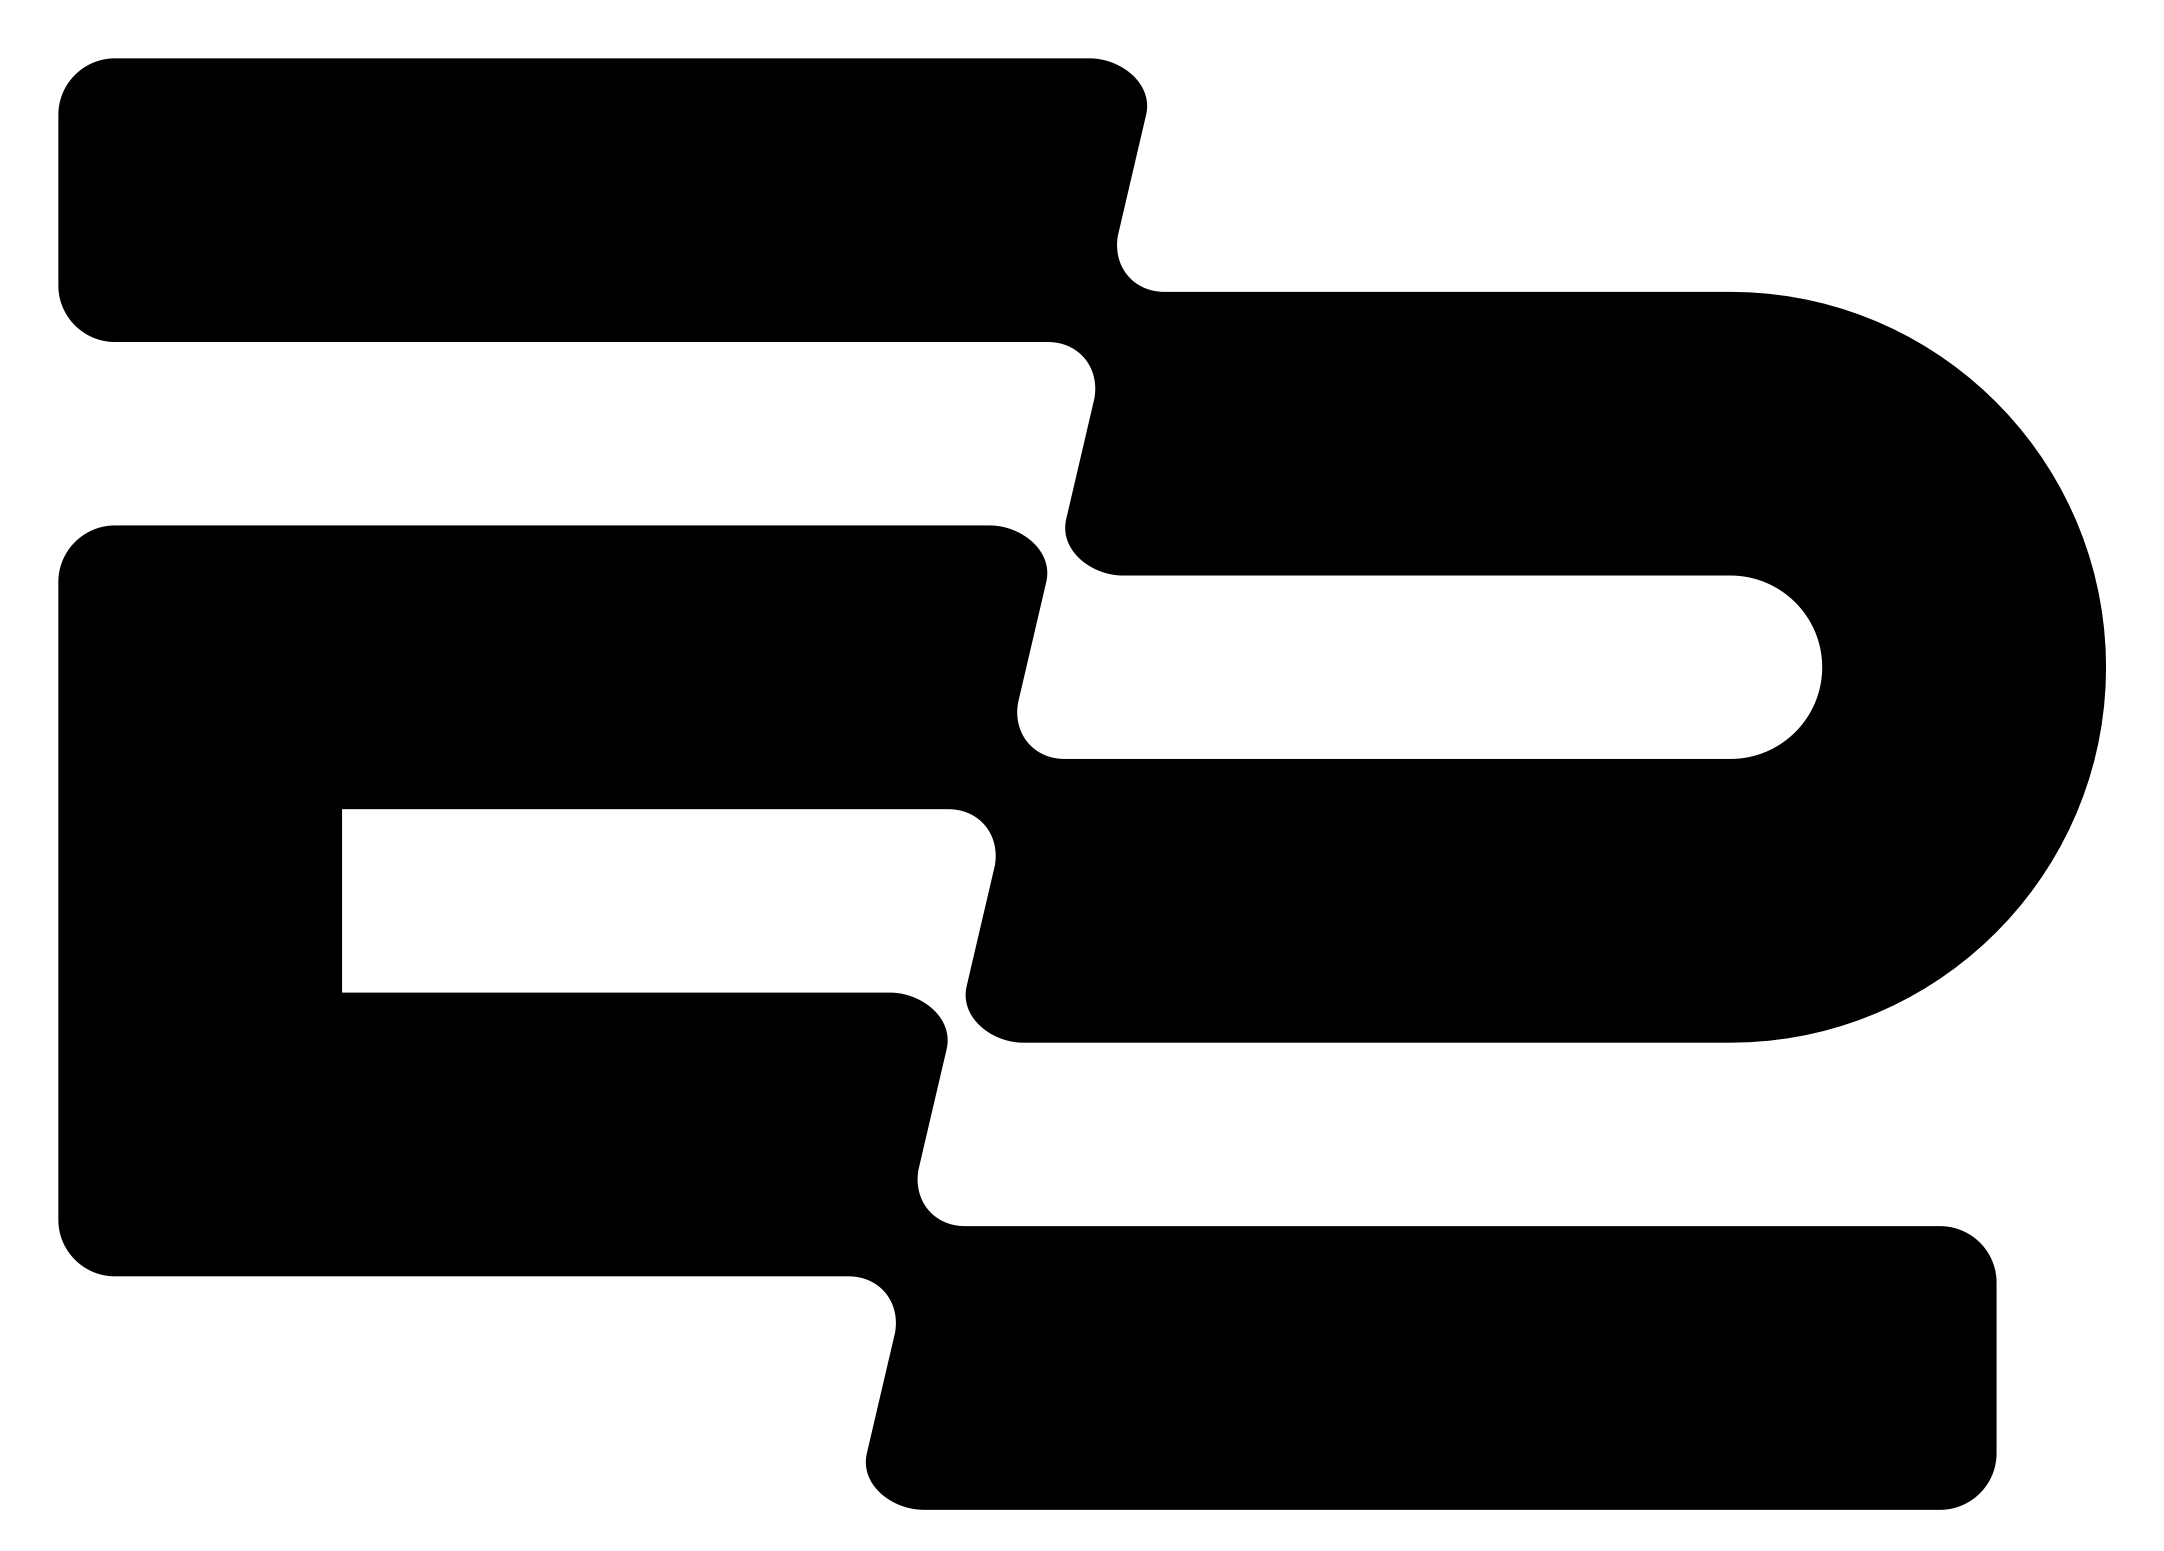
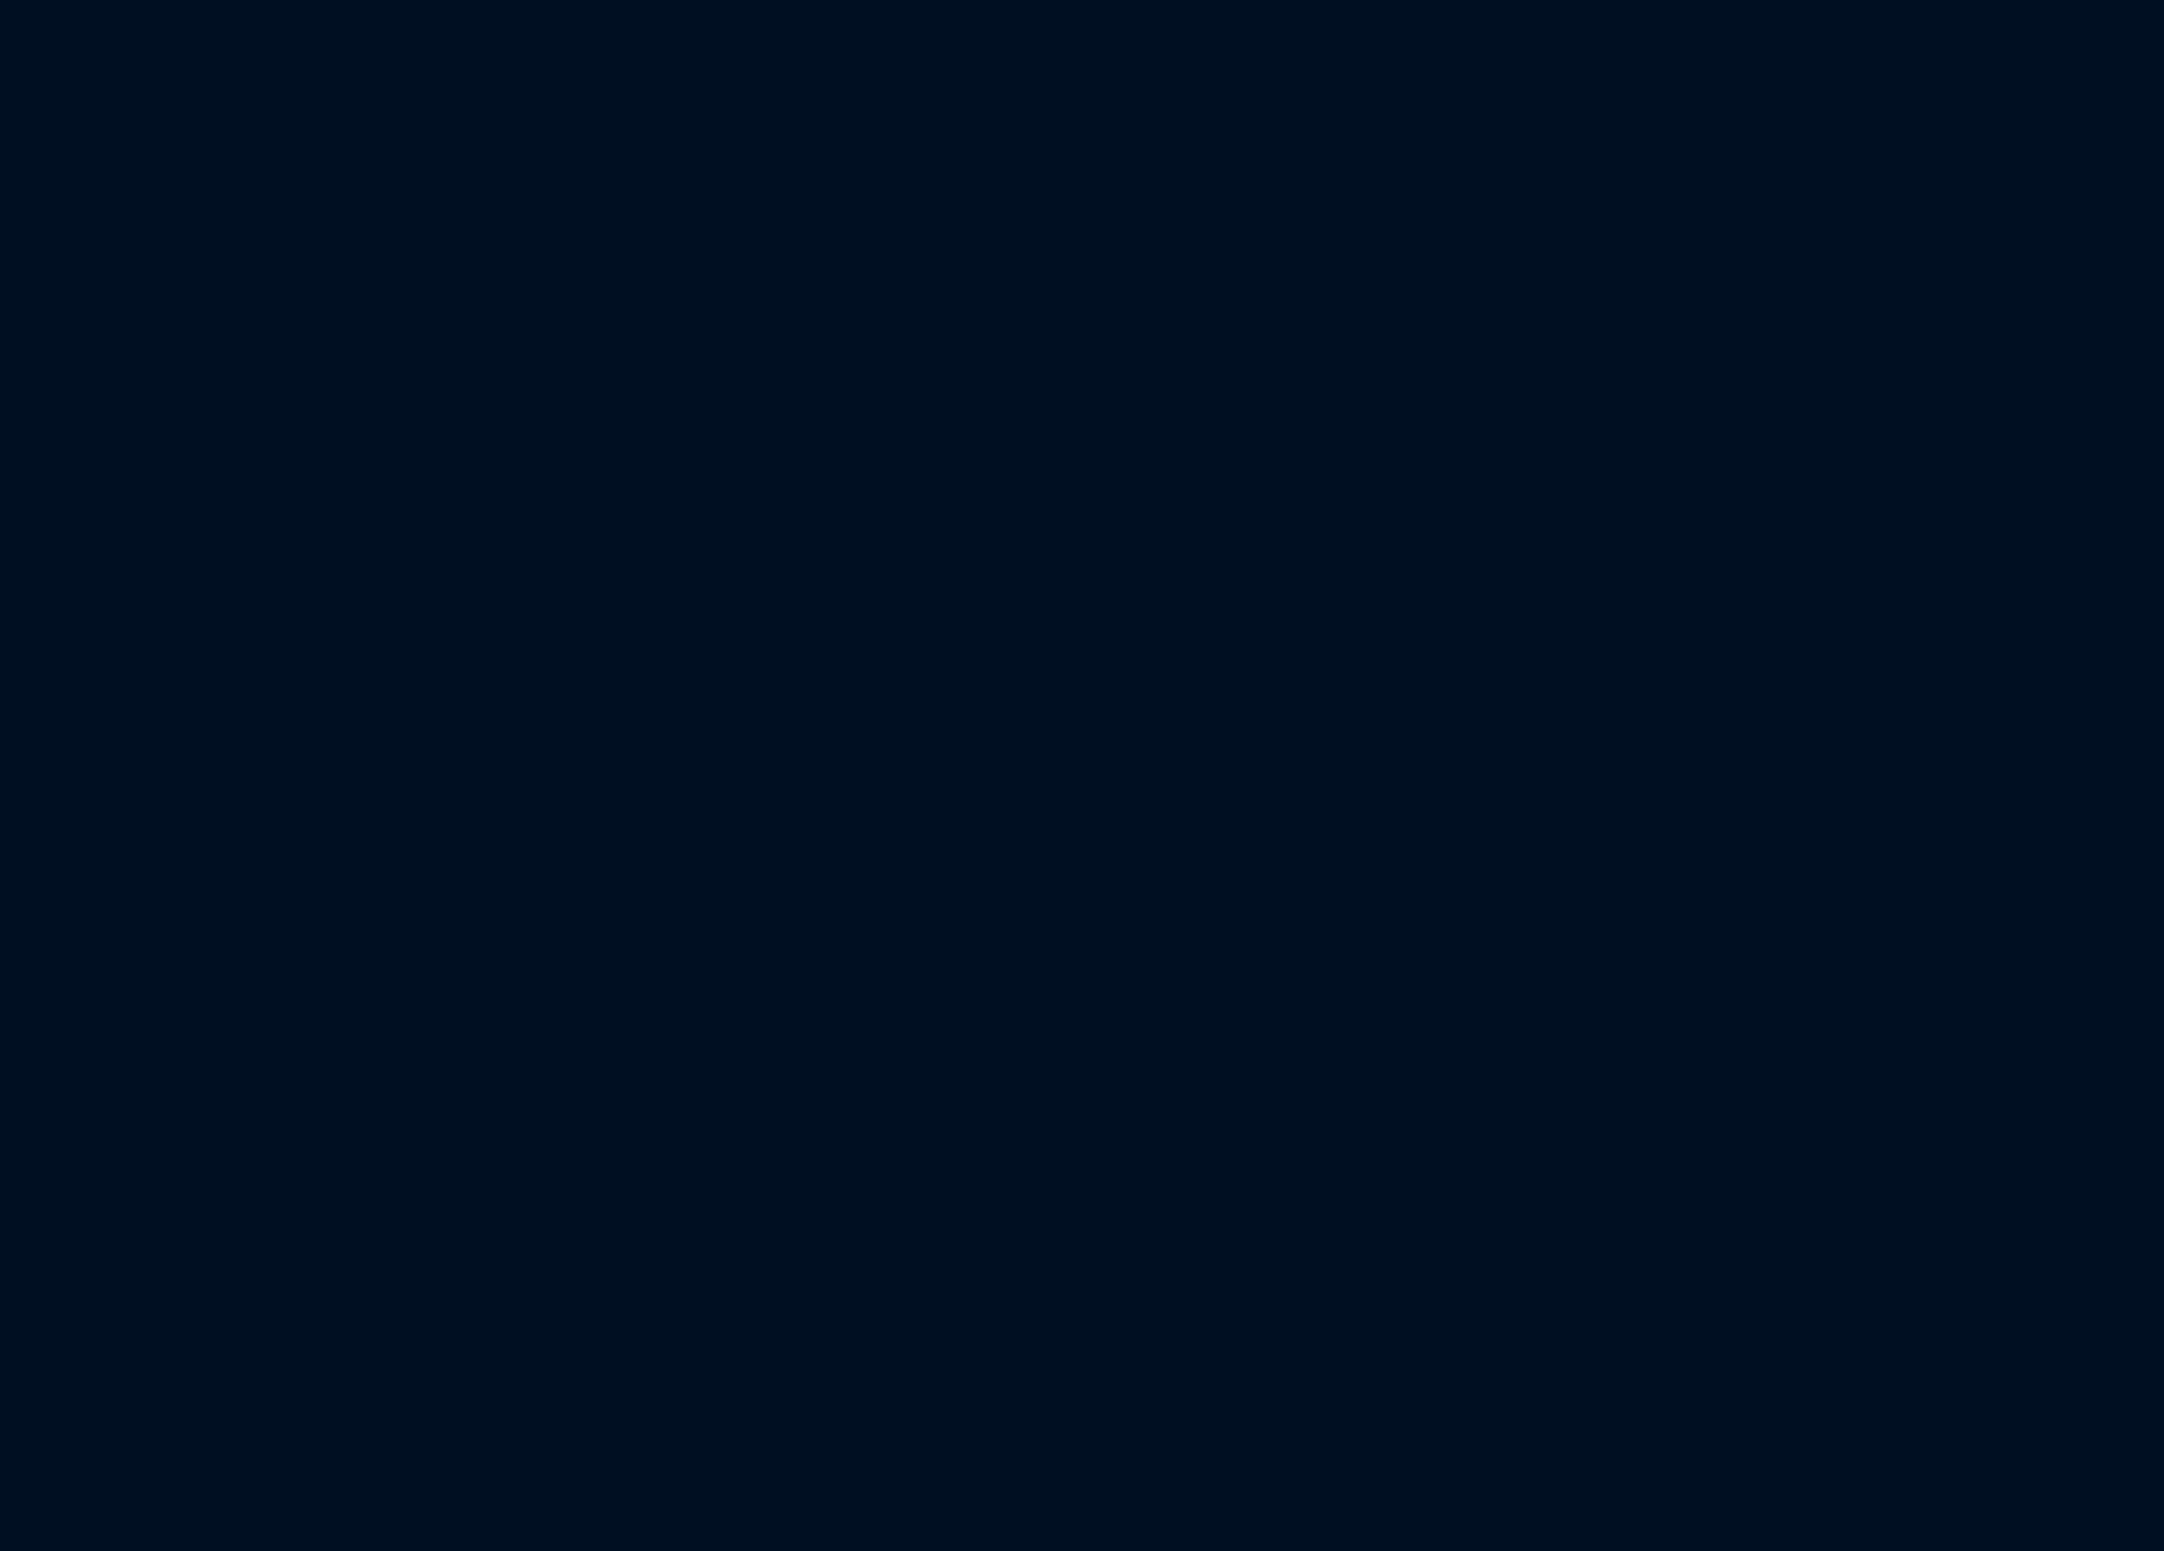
drawing: [58, 58, 2107, 1510] -> none

